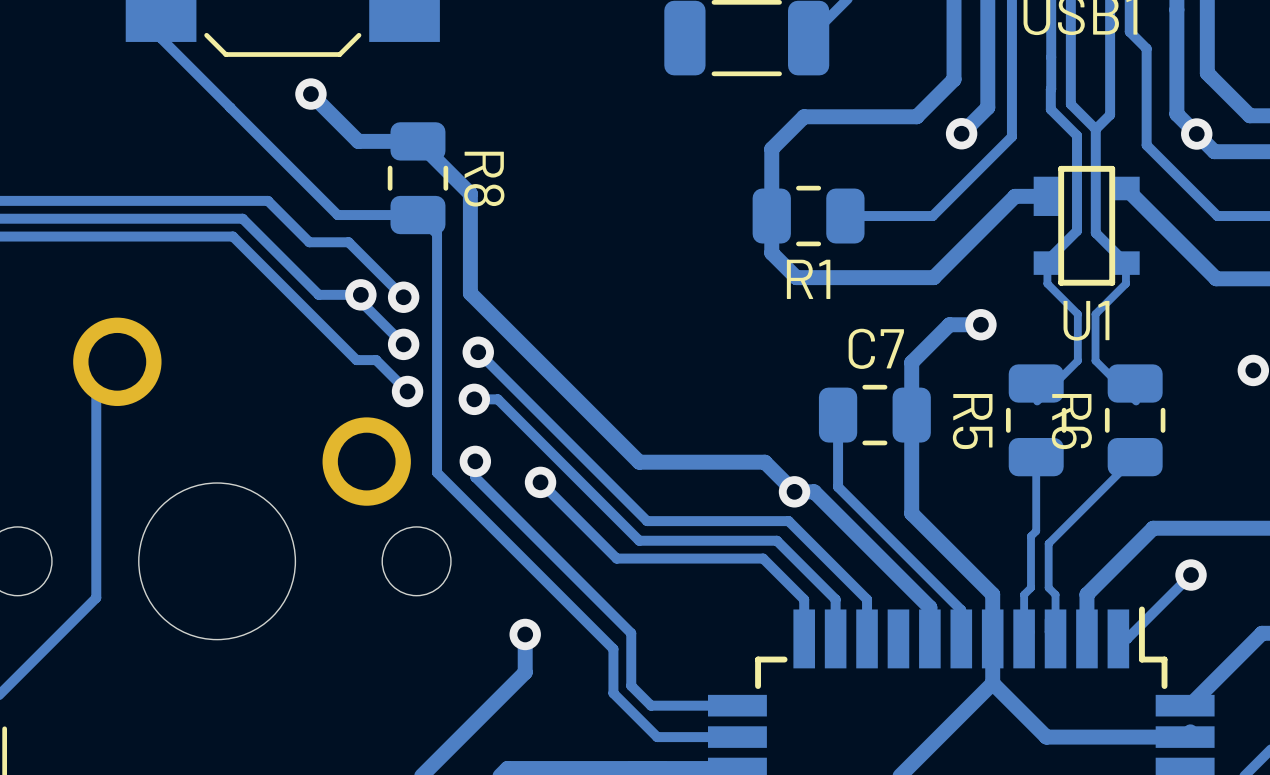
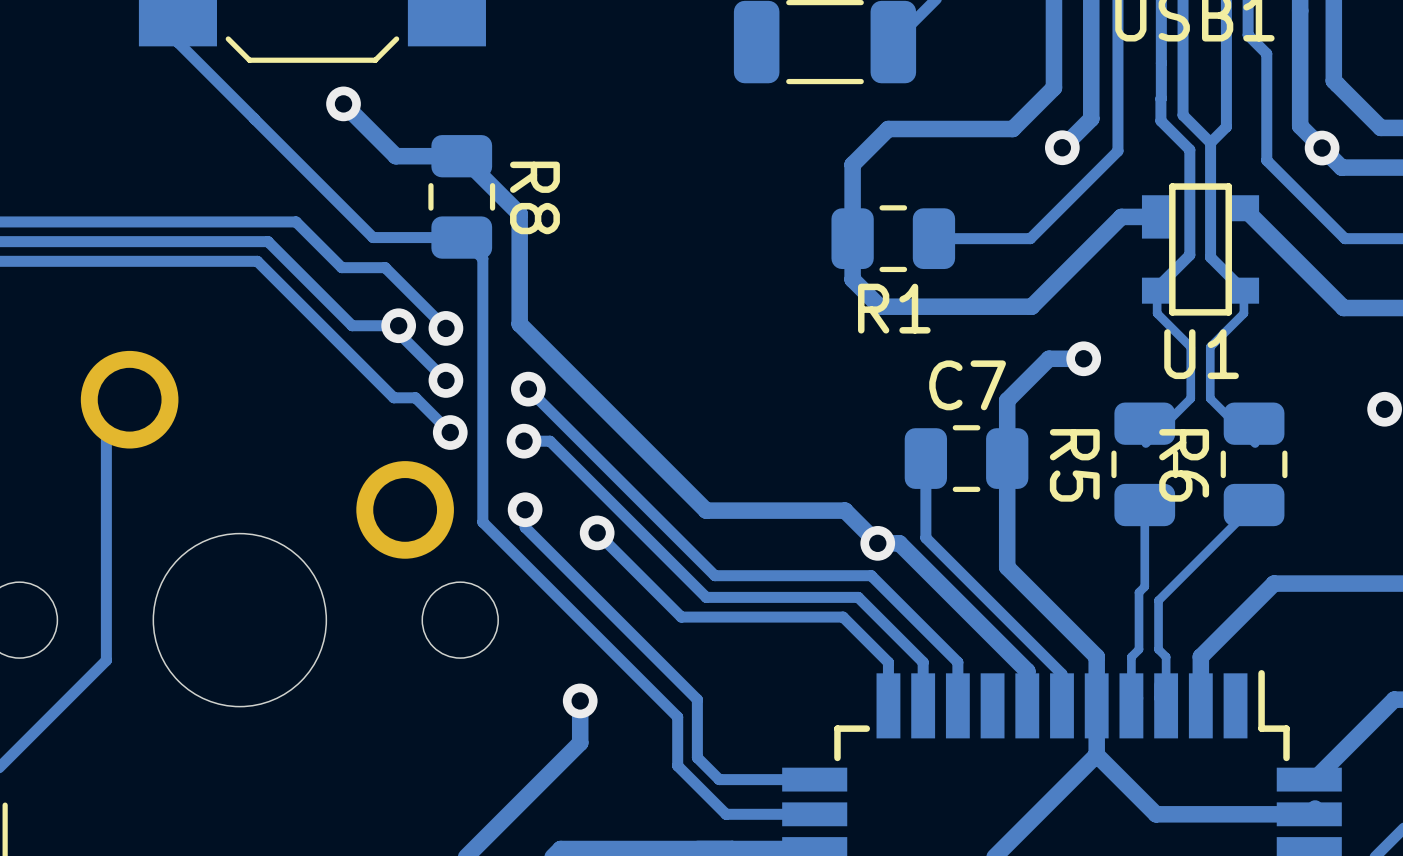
track: (1191, 575) (1127, 638) (1118, 638) -> none
via: (1191, 575) -> none

